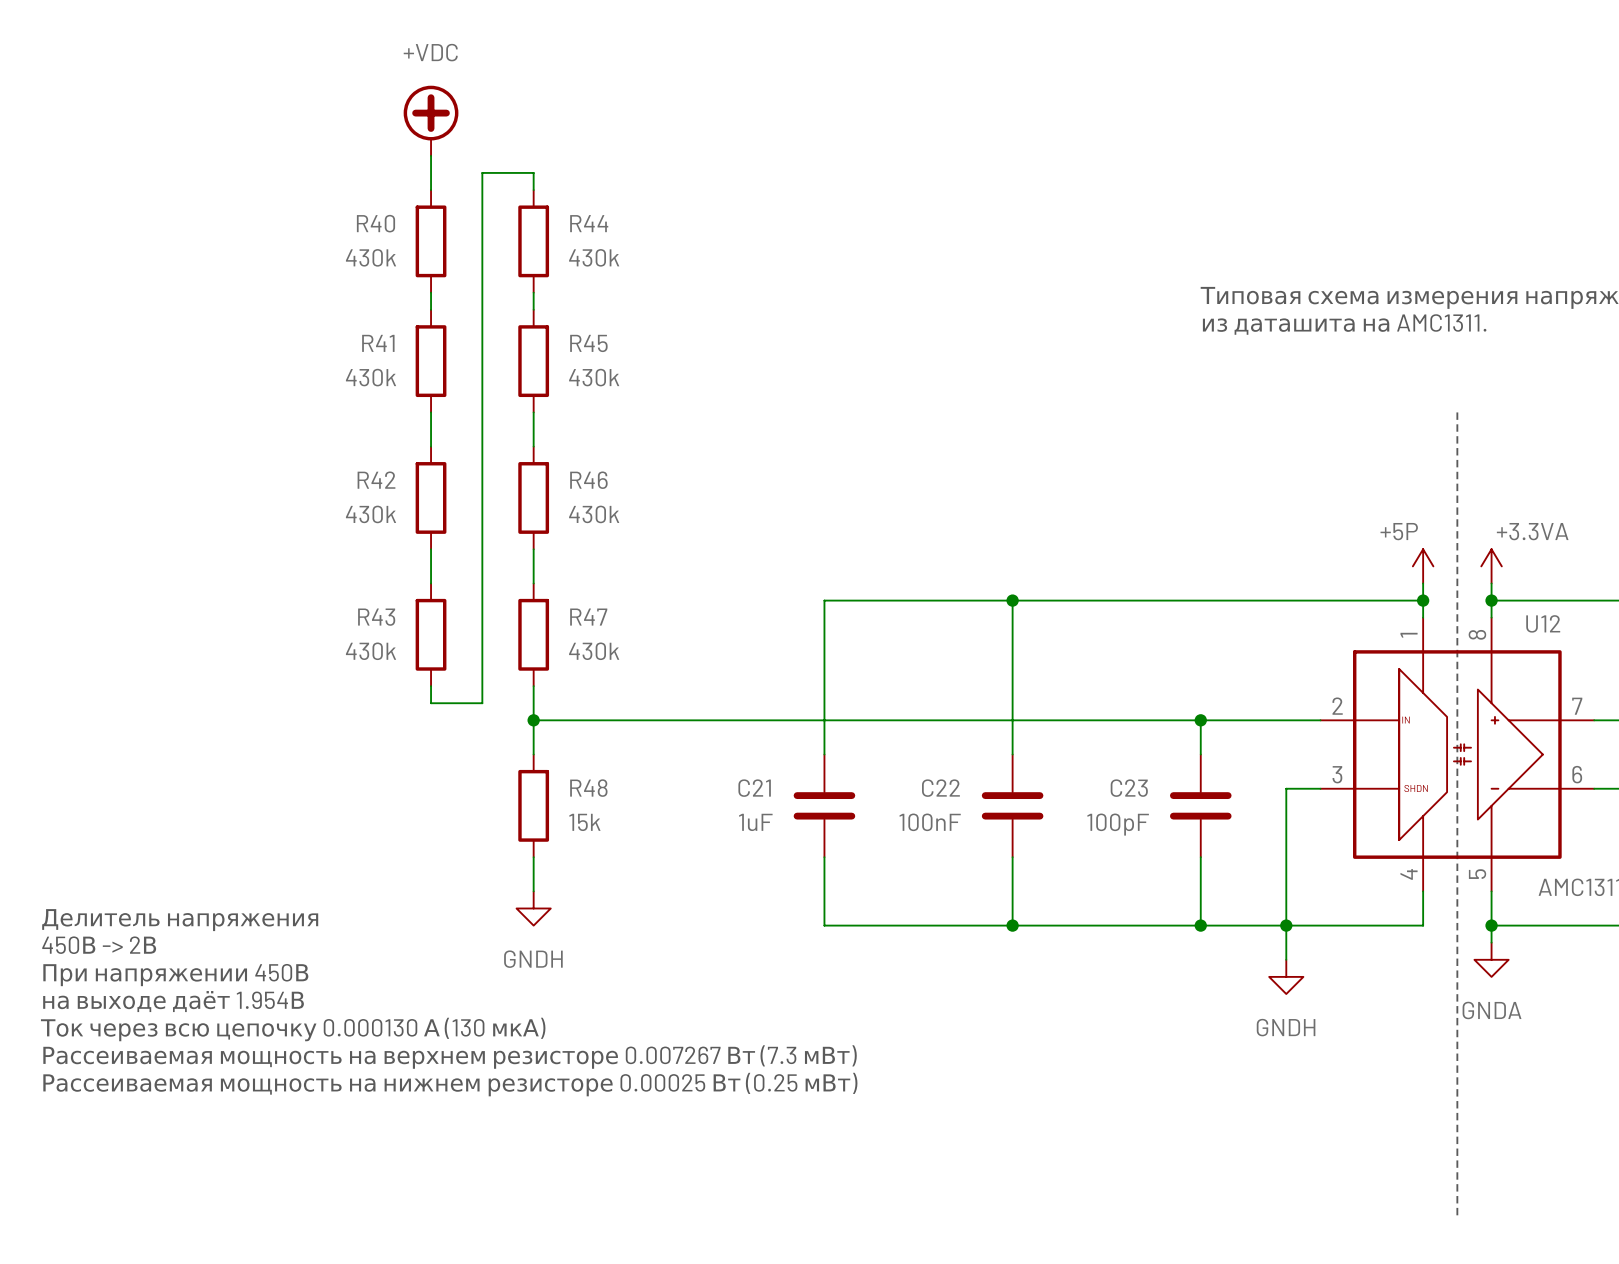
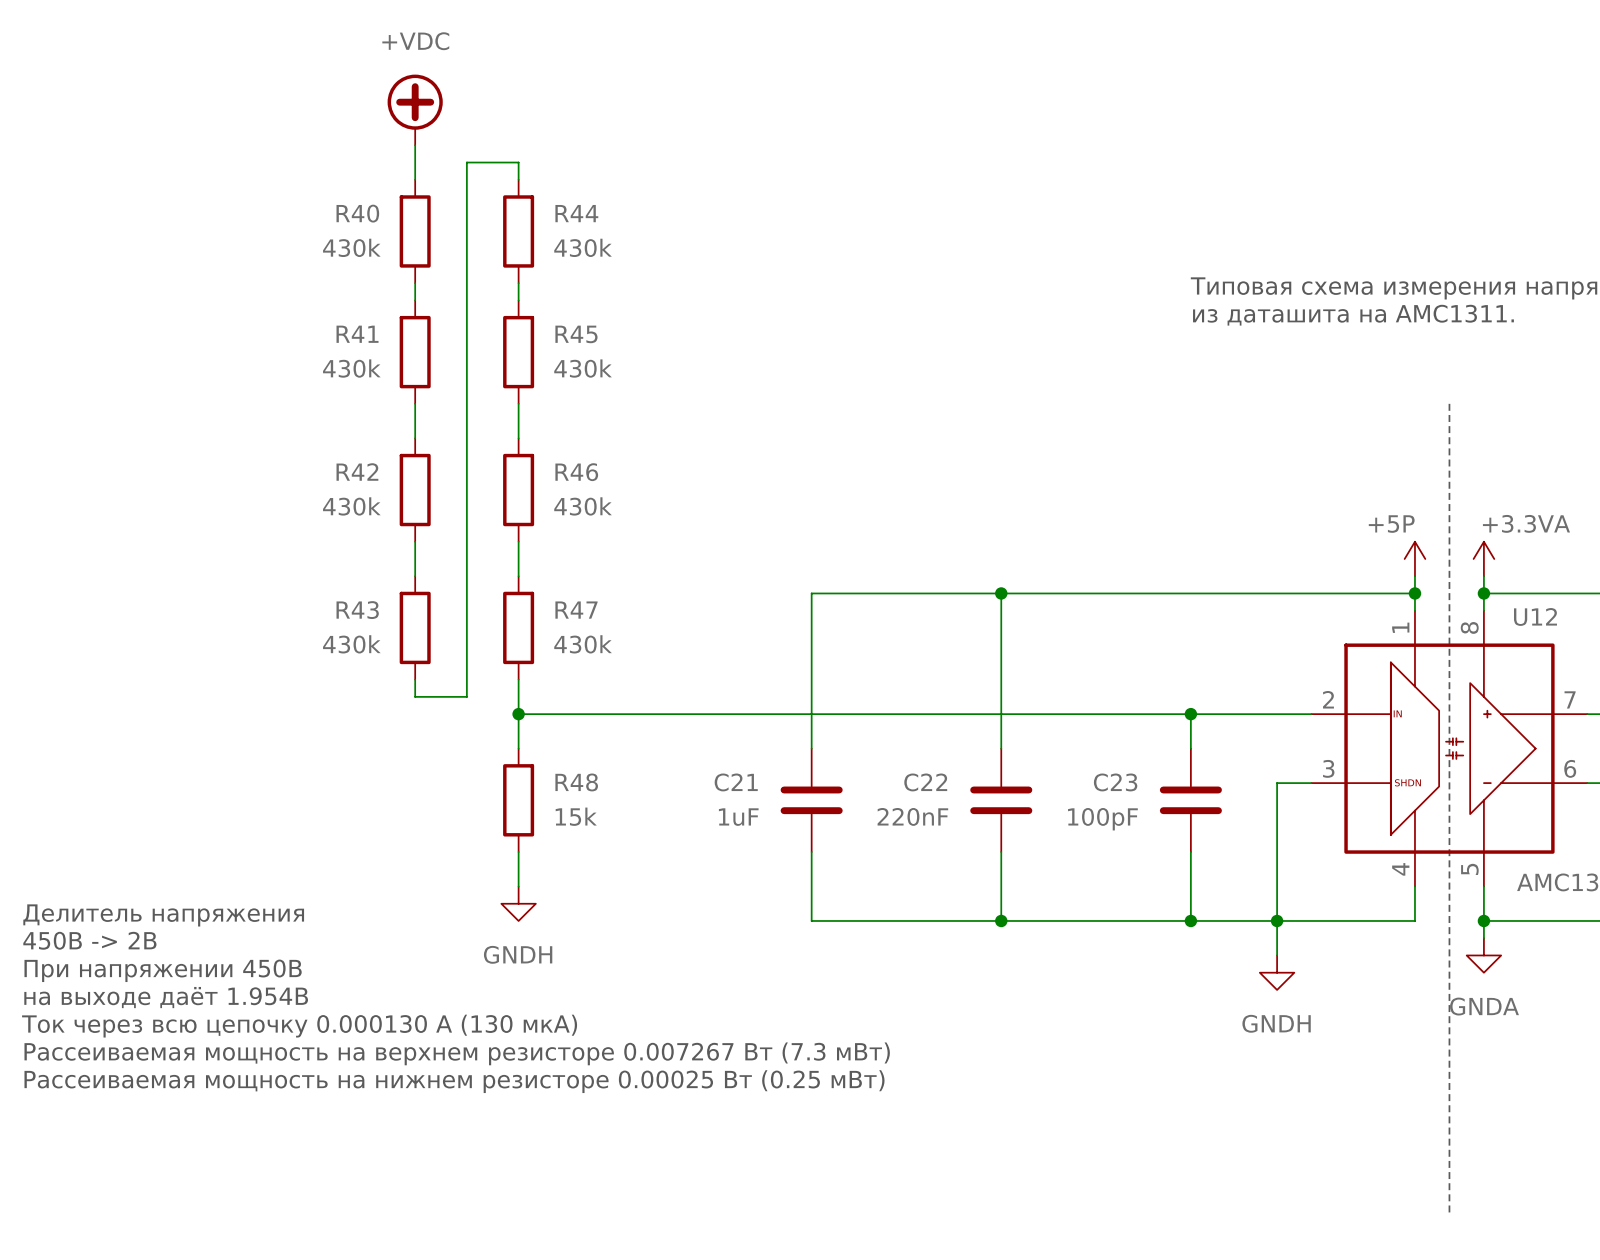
C22 value: 100nF (930, 822) -> 220nF (912, 816)

